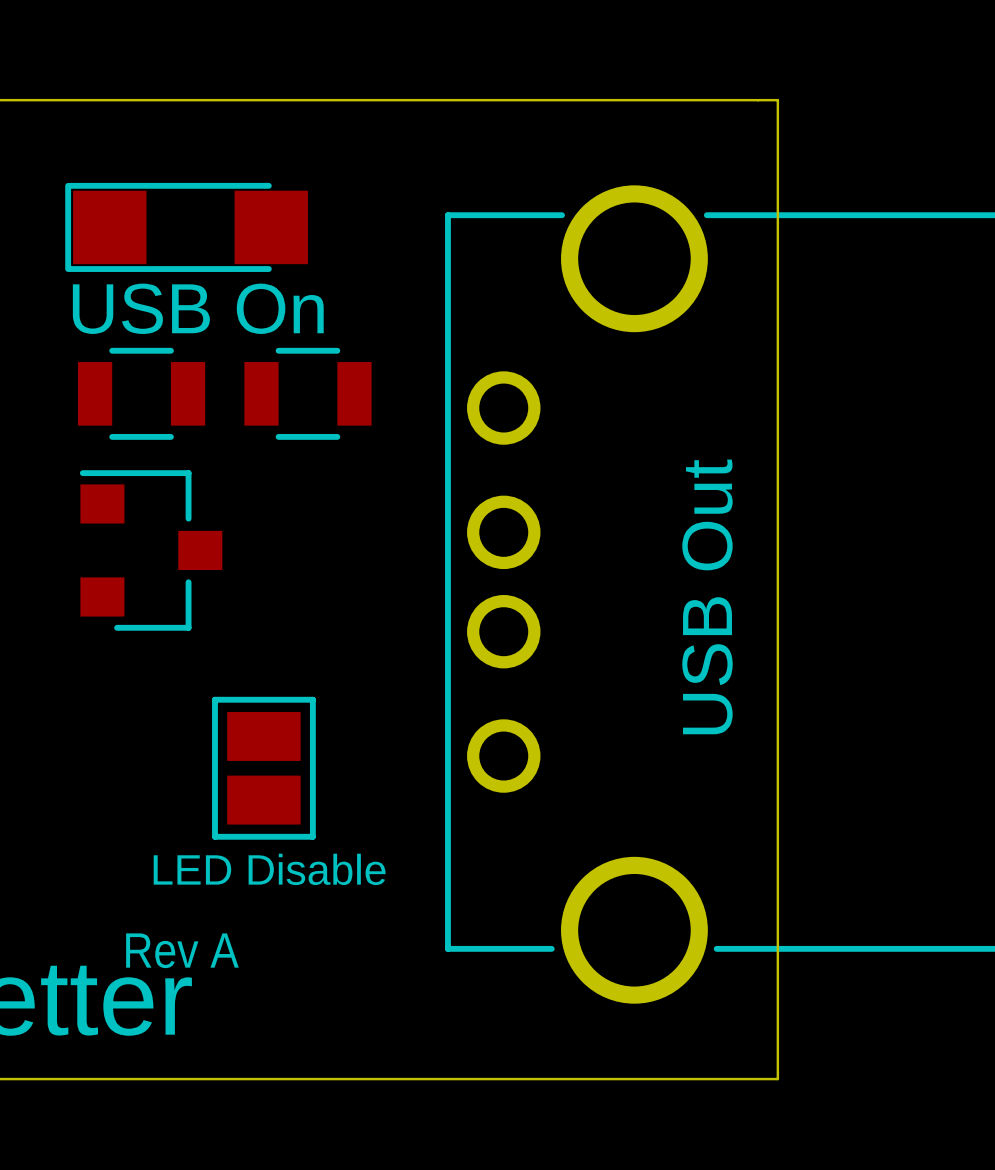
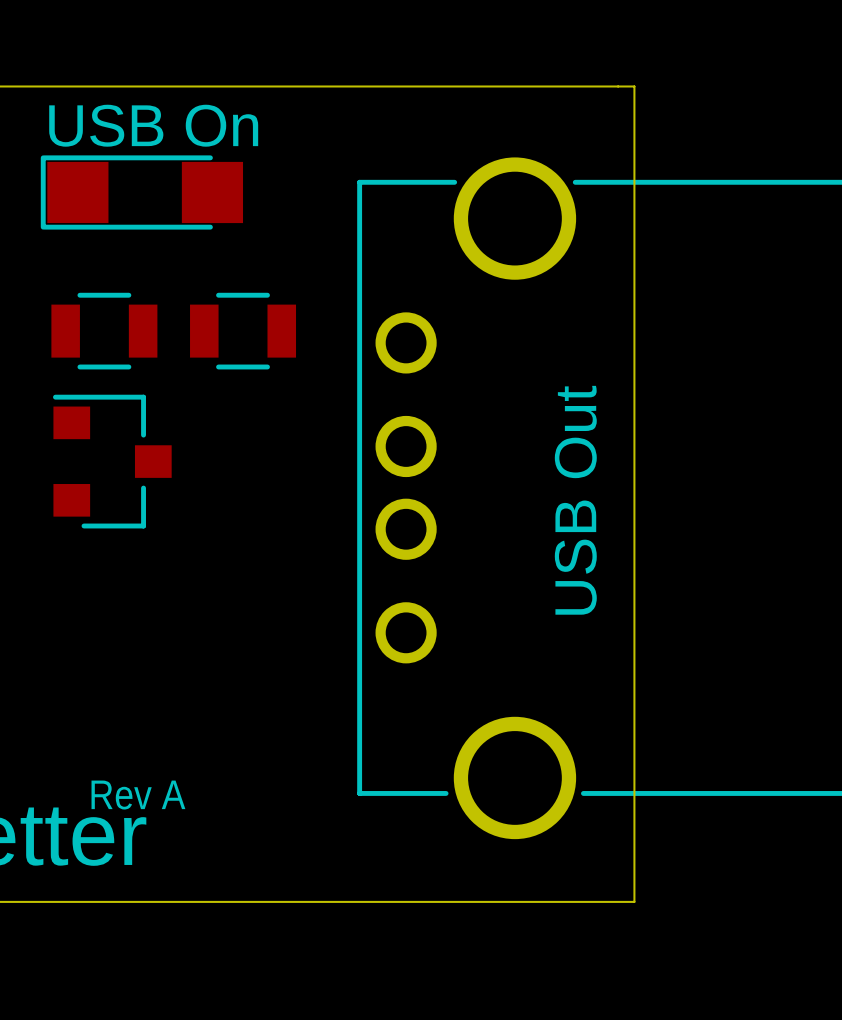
part value position: USB On (198, 308) -> USB On (153, 125)
part: LED Disable (263, 768) -> none

